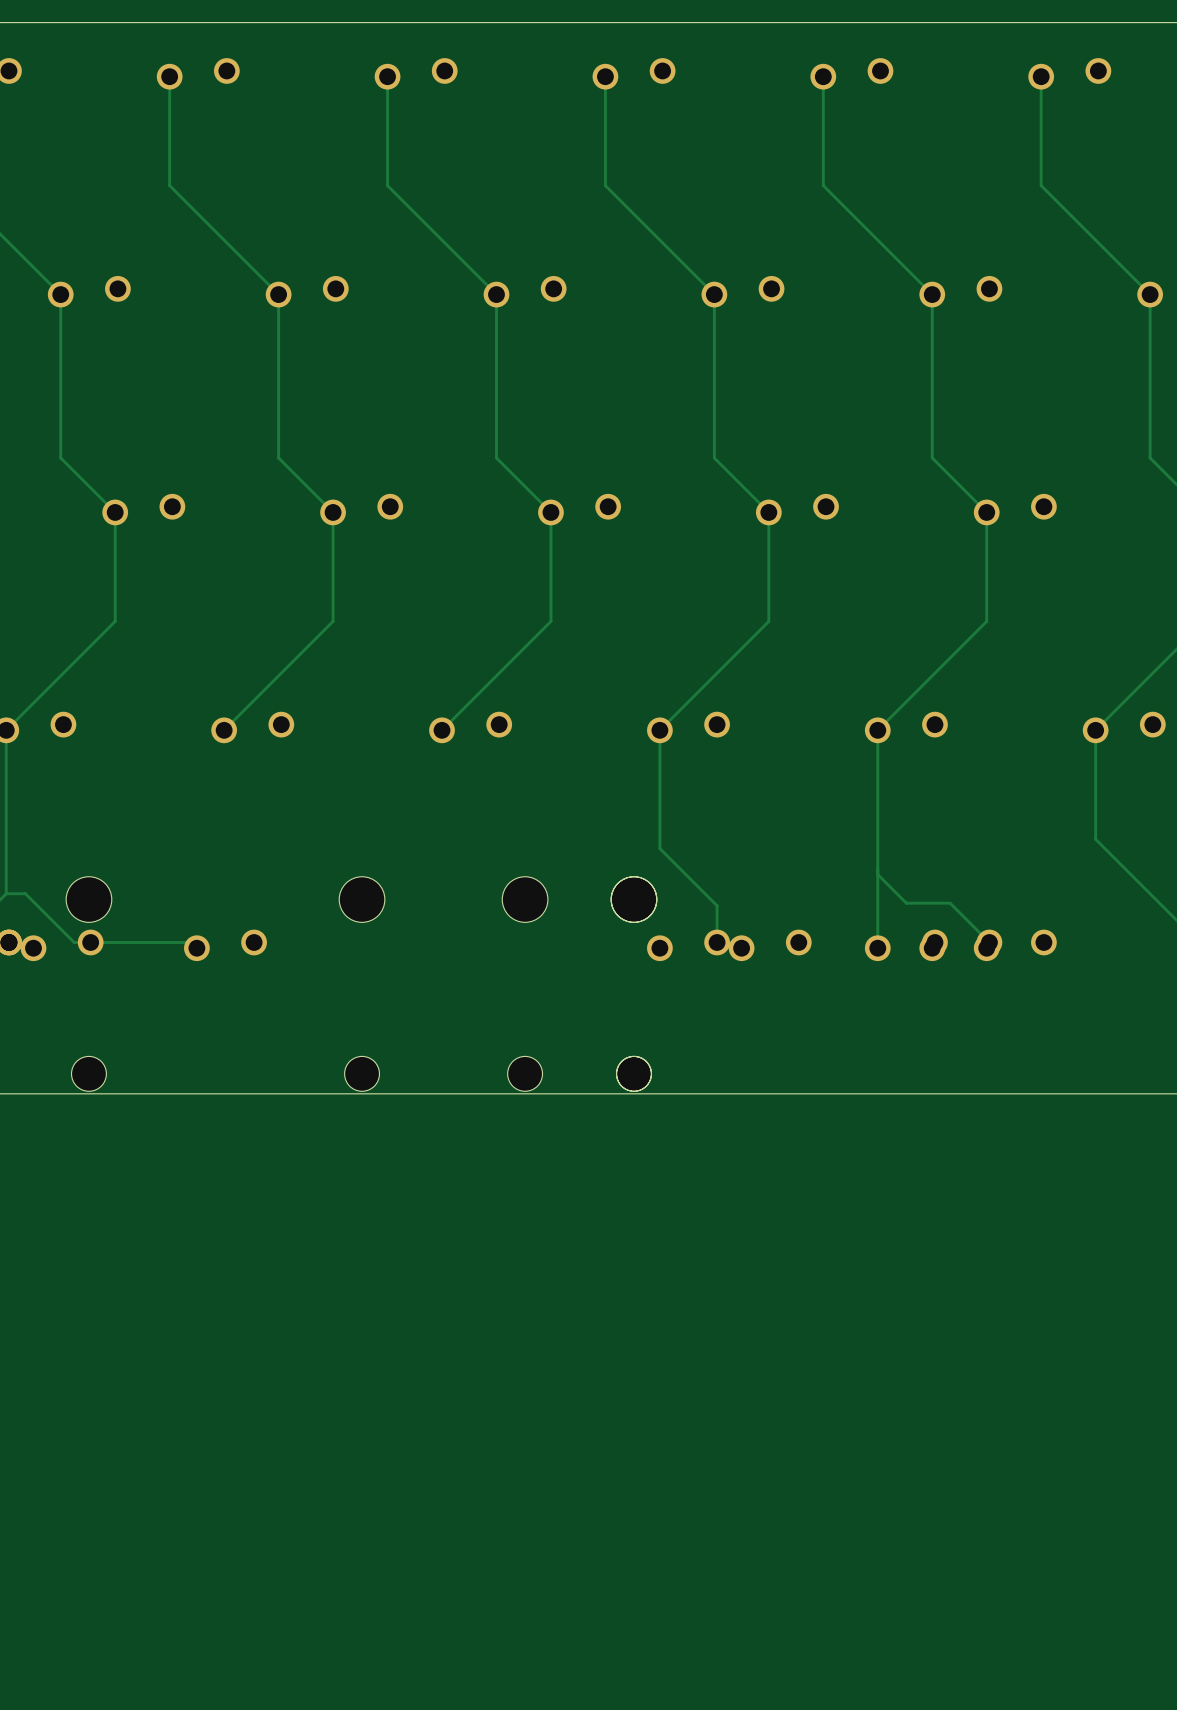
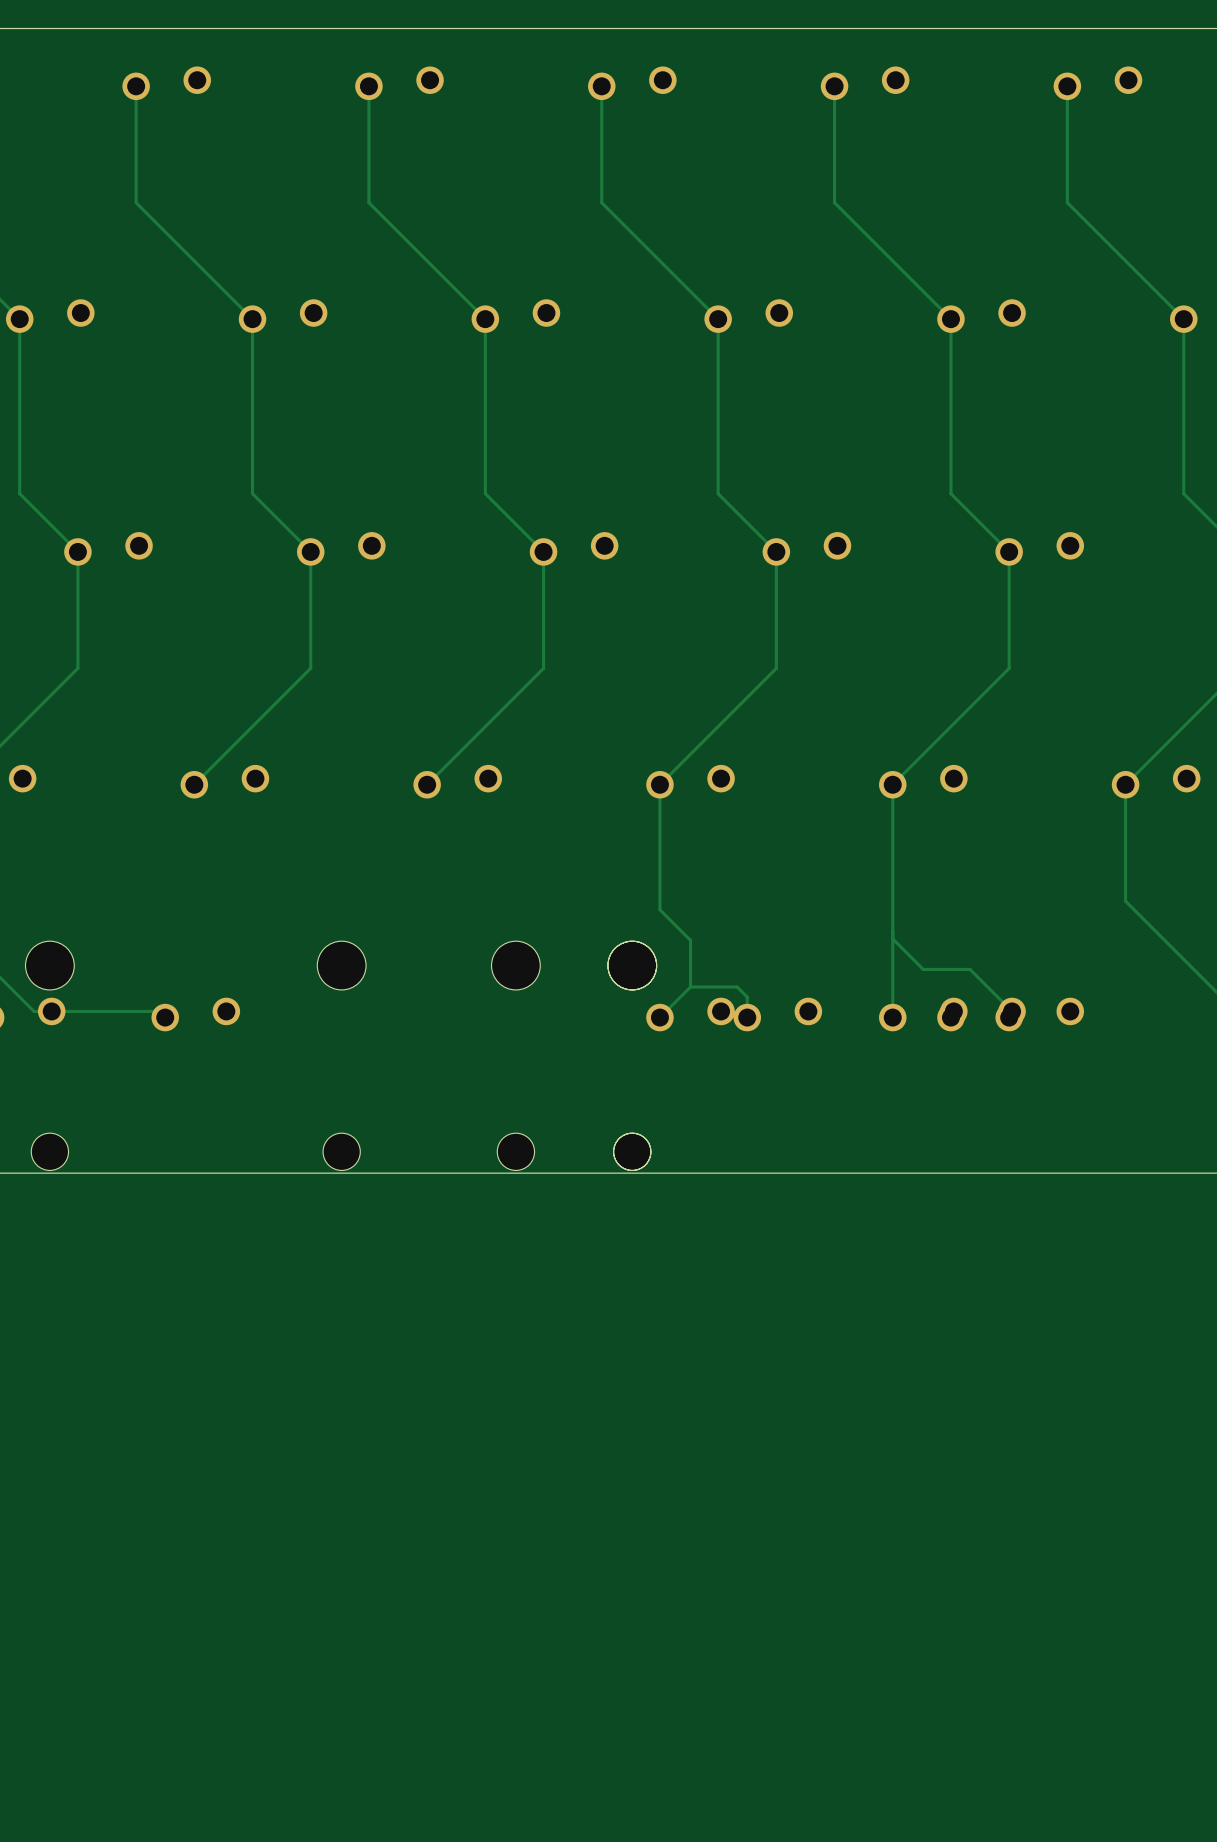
track: (659, 847) (717, 905) (717, 942) (735, 942) (741, 948) -> (659, 909) (690, 940) (690, 987)
track: none -> (690, 987) (659, 1017)
track: none -> (690, 987) (737, 987) (747, 997) (747, 1017)

